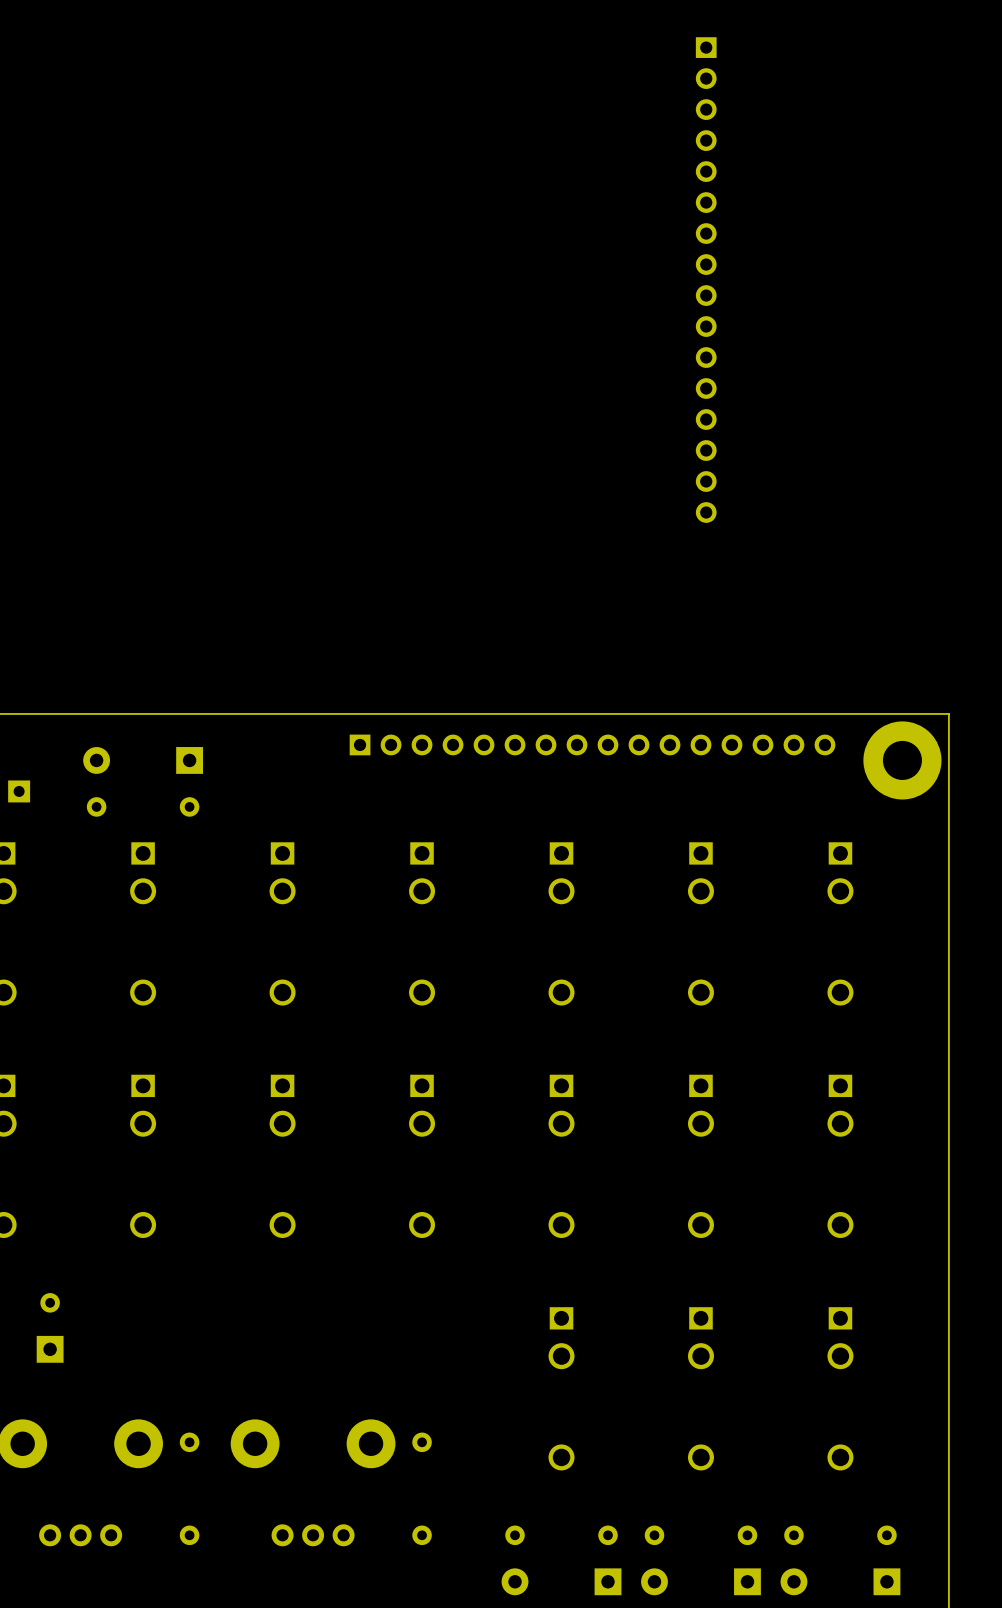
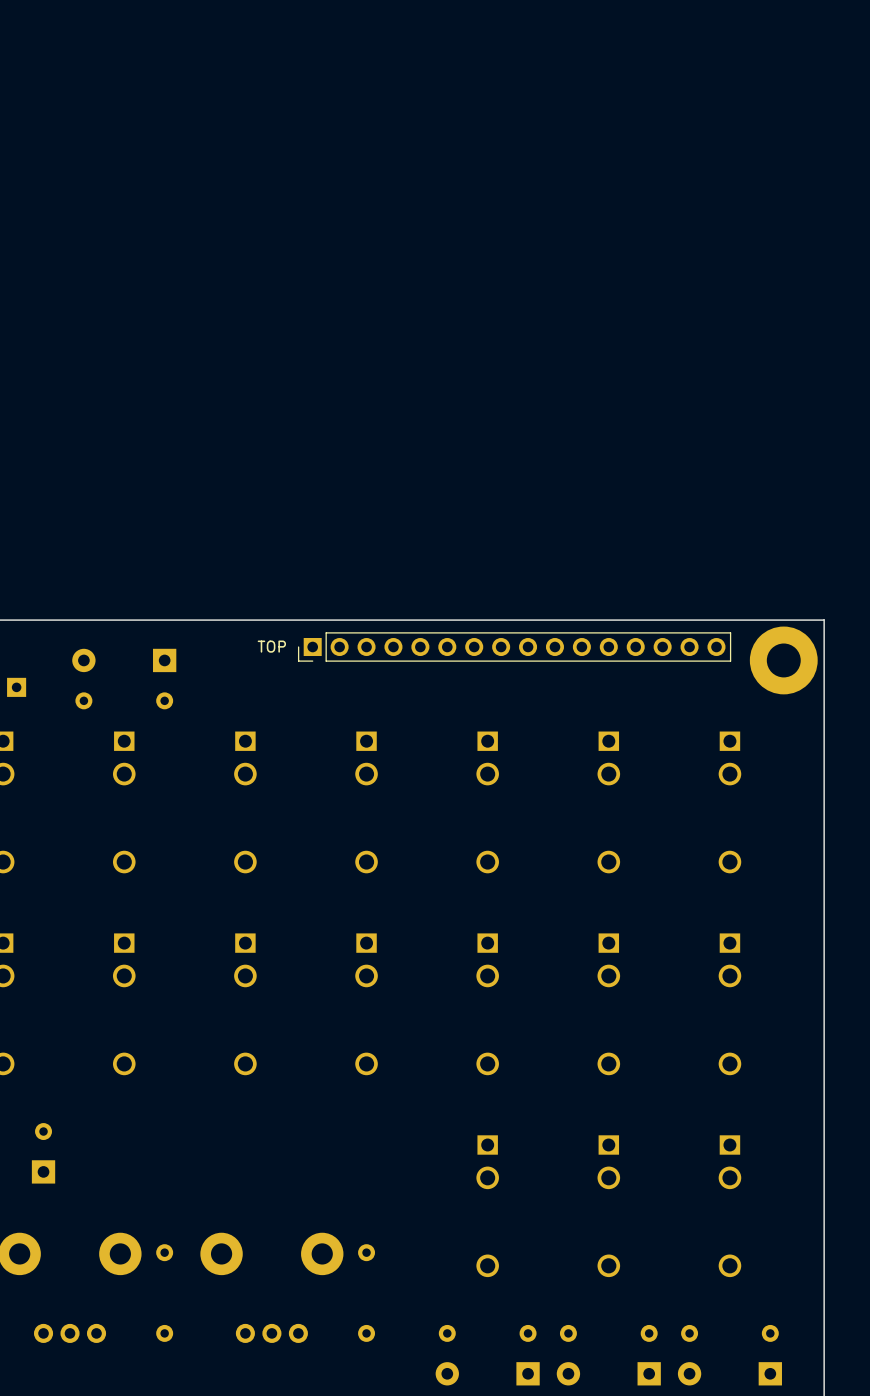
part: (706, 280) -> none
part side: top (592, 744) -> bottom (514, 647)

